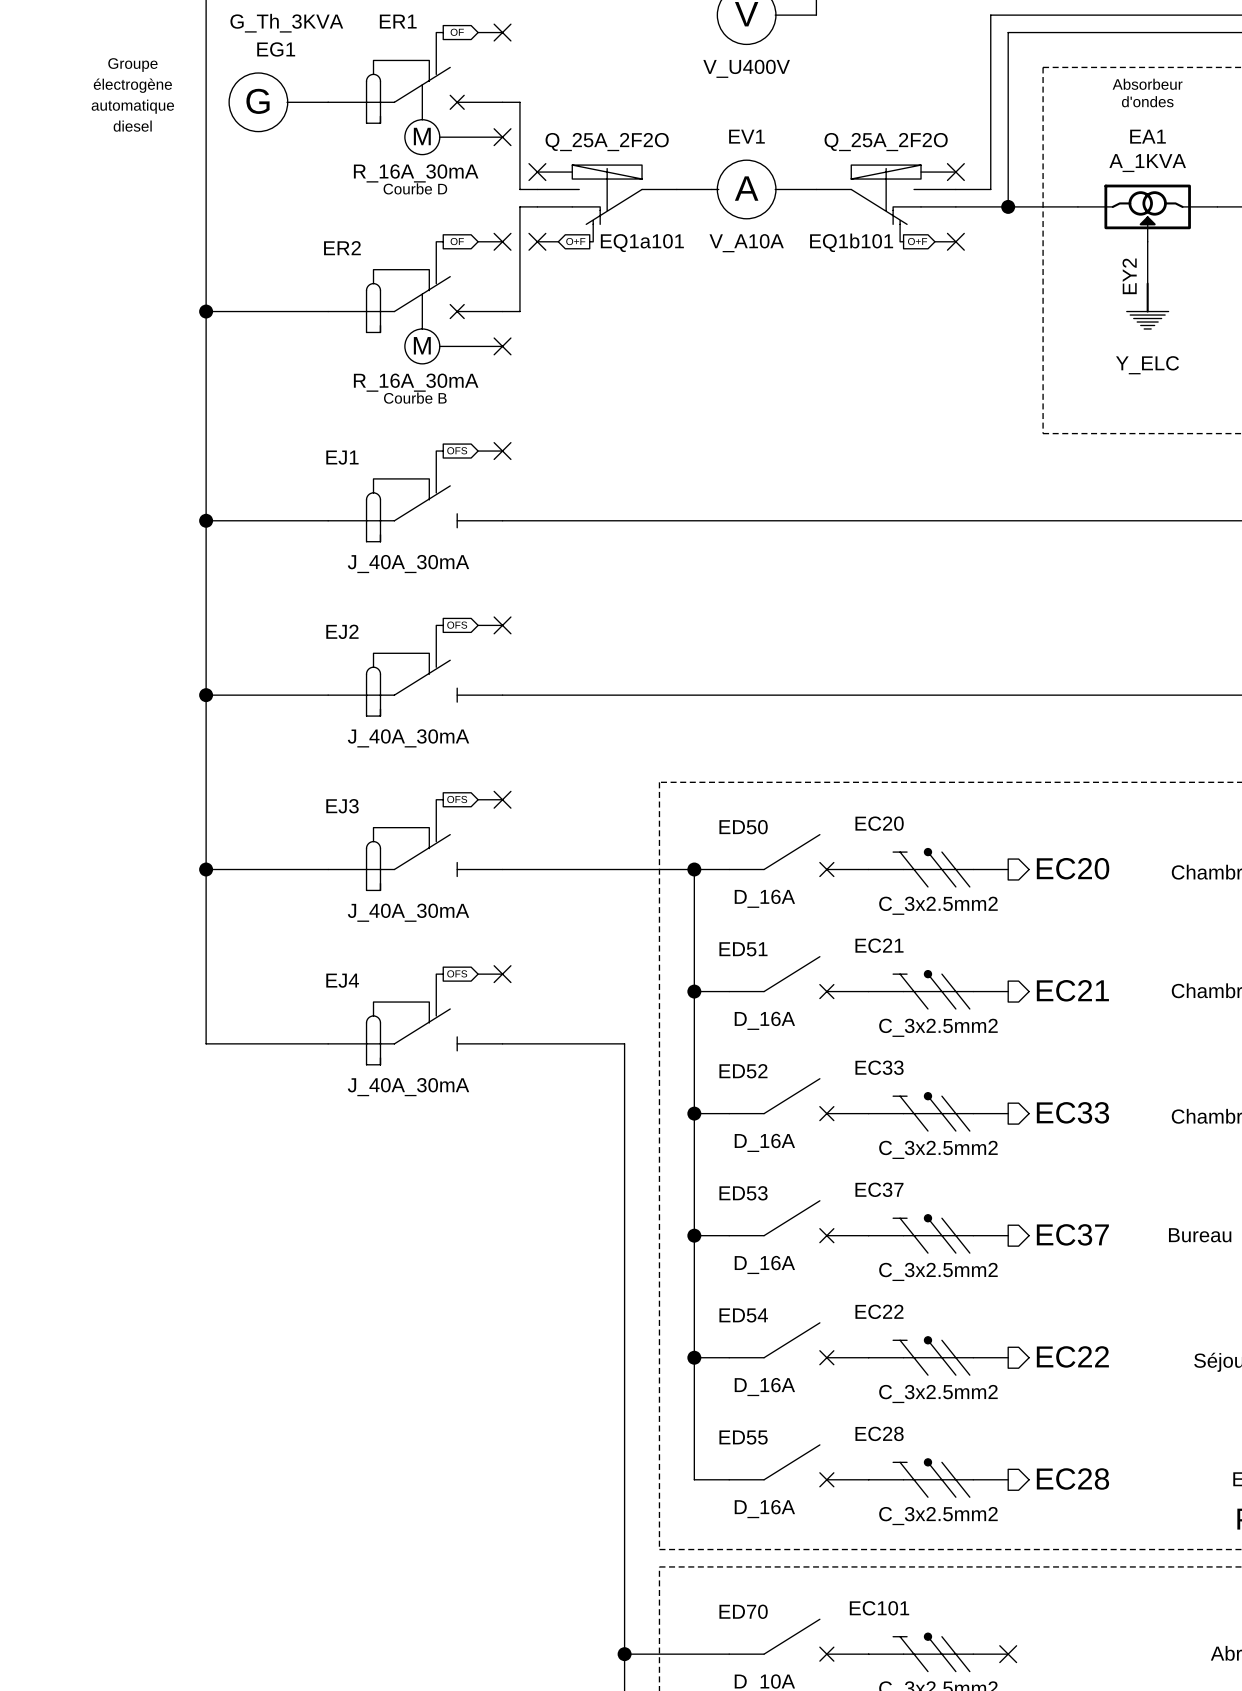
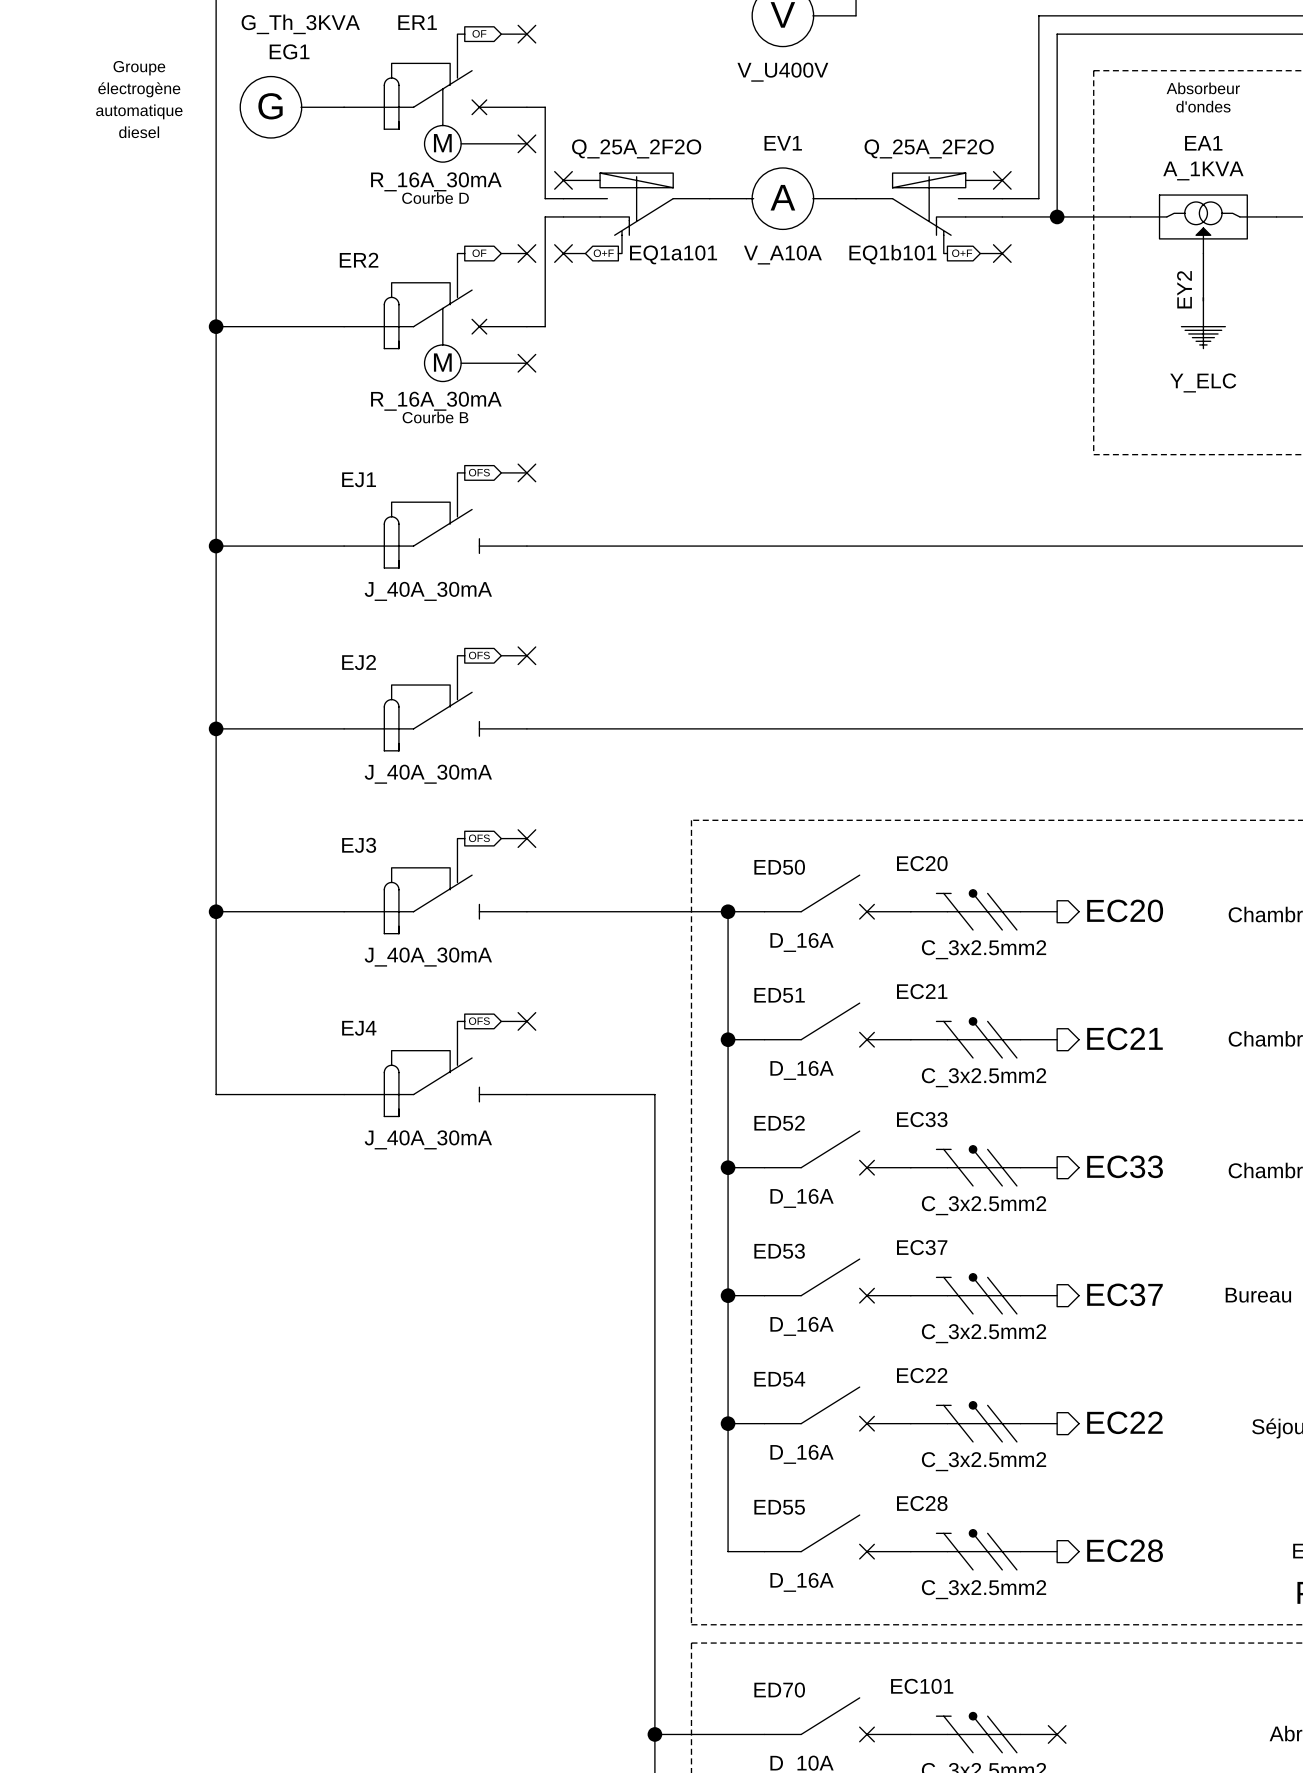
EA1 symbol: [1077, 184, 1218, 242] -> [1130, 195, 1277, 291]
EY2 symbol: [1126, 241, 1169, 329] -> [1181, 253, 1277, 349]

